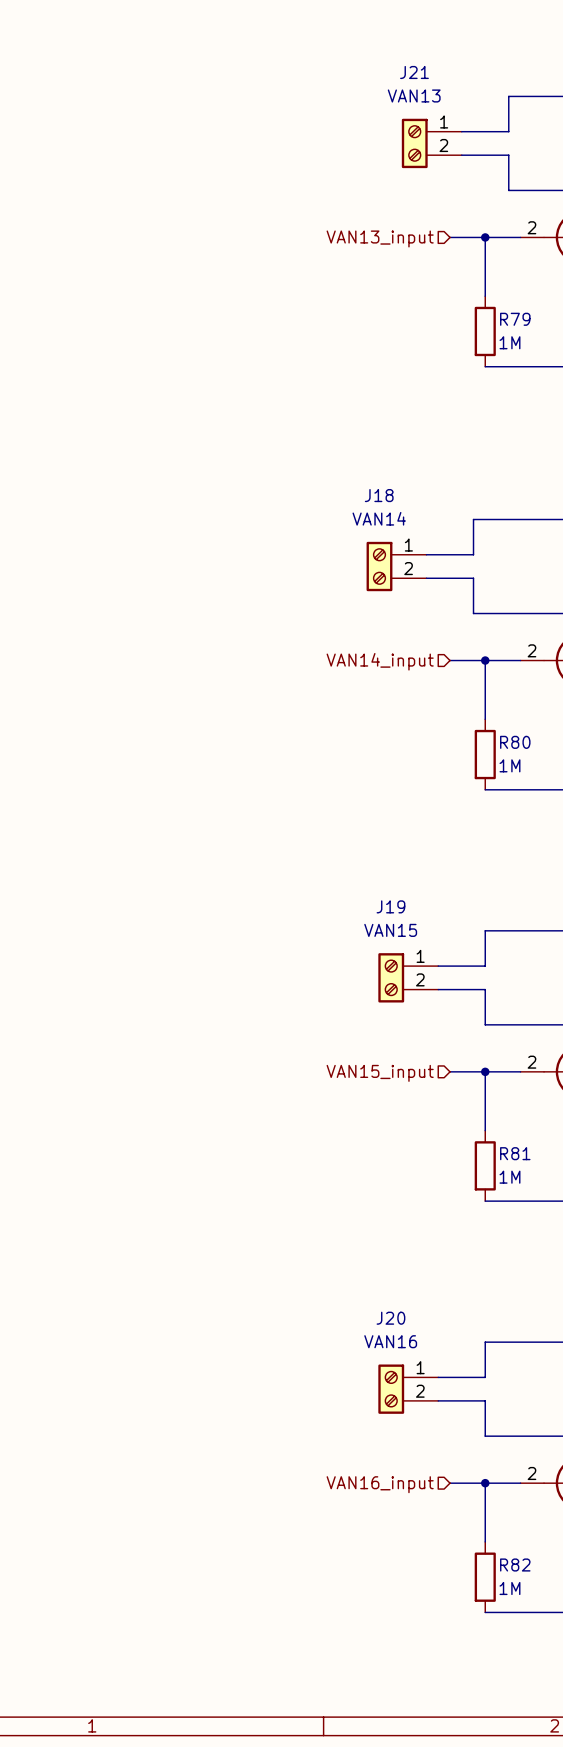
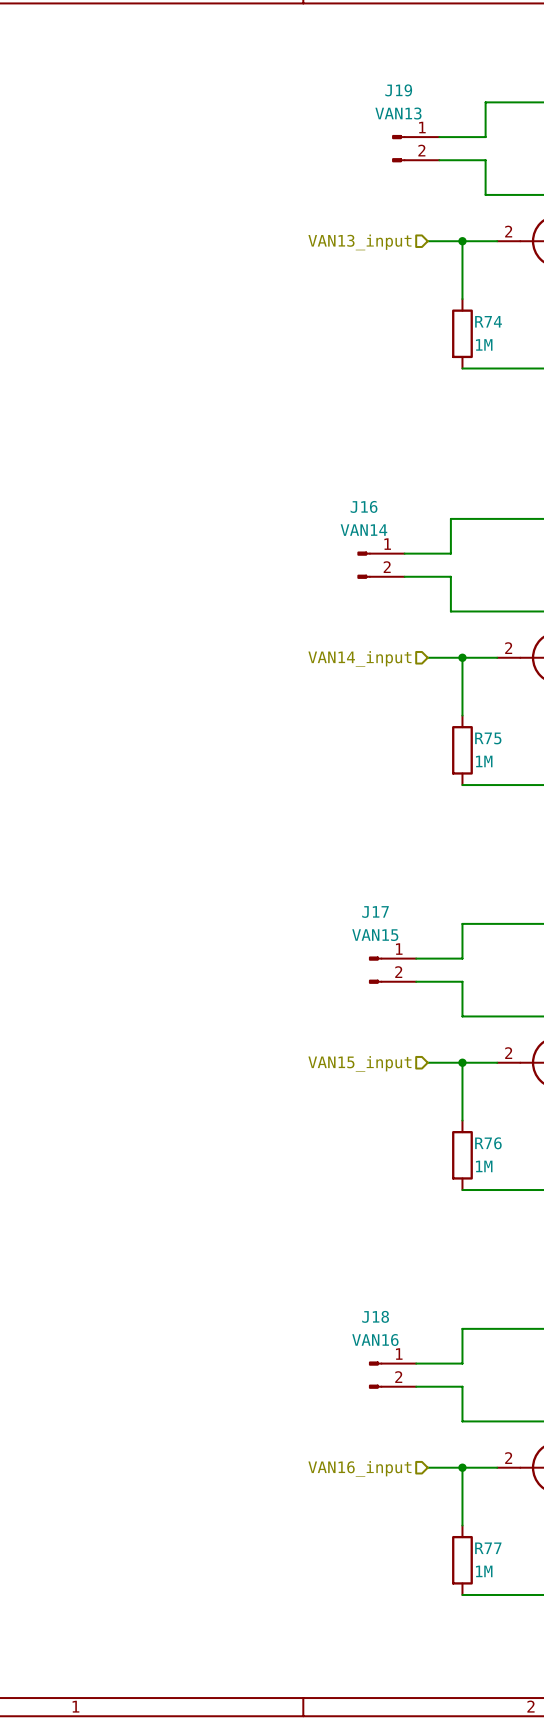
J21: VAN13 (431, 143) -> none
R79 name: R79 (515, 319) -> R74 (488, 321)
J18 value: VAN14 (379, 518) -> VAN16 (375, 1340)
J18 symbol: [366, 541, 427, 592] -> [369, 1361, 417, 1389]
J16: none -> VAN14 (381, 565)
R80 name: R80 (515, 742) -> R75 (488, 738)
J19 value: VAN15 (390, 930) -> VAN13 (398, 113)
J19 symbol: [378, 953, 439, 1003] -> [392, 135, 440, 163]
J17: none -> VAN15 (392, 970)
R81 name: R81 (515, 1153) -> R76 (488, 1143)
J20: VAN16 (408, 1389) -> none
R82 name: R82 (515, 1565) -> R77 (488, 1548)

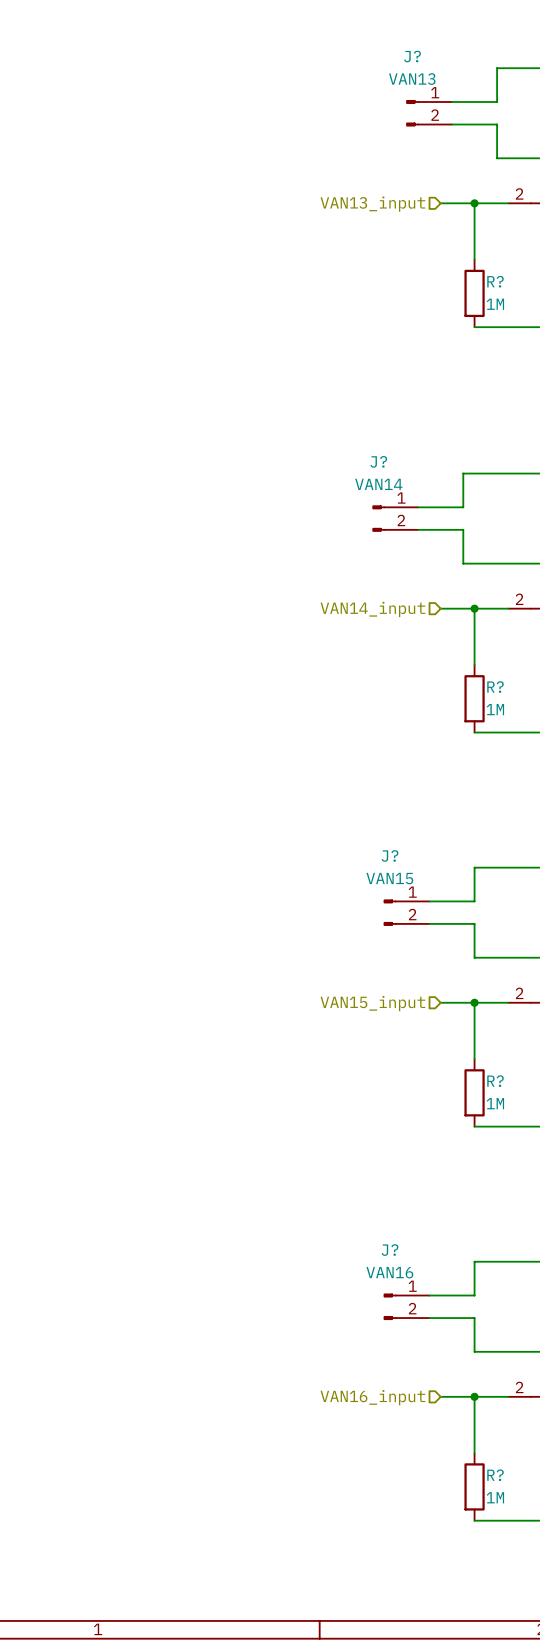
J19 name: J19 (398, 90) -> J? (412, 56)
R74 name: R74 (488, 321) -> R? (495, 281)
J16 name: J16 (364, 506) -> J? (378, 461)
R75 name: R75 (488, 738) -> R? (495, 687)
J17 name: J17 (375, 912) -> J? (389, 855)
R76 name: R76 (488, 1143) -> R? (495, 1081)
J18 name: J18 (375, 1316) -> J? (389, 1250)
R77 name: R77 (488, 1548) -> R? (495, 1475)

